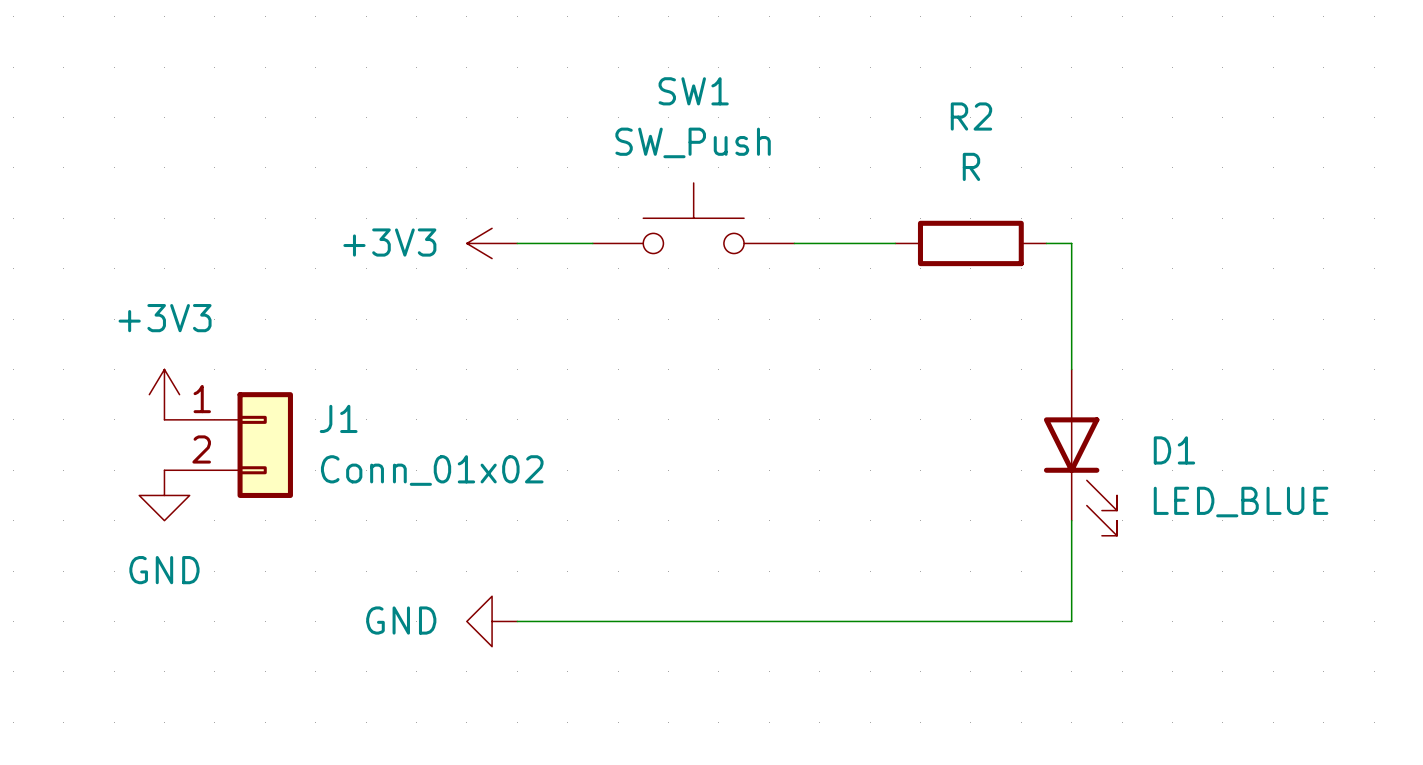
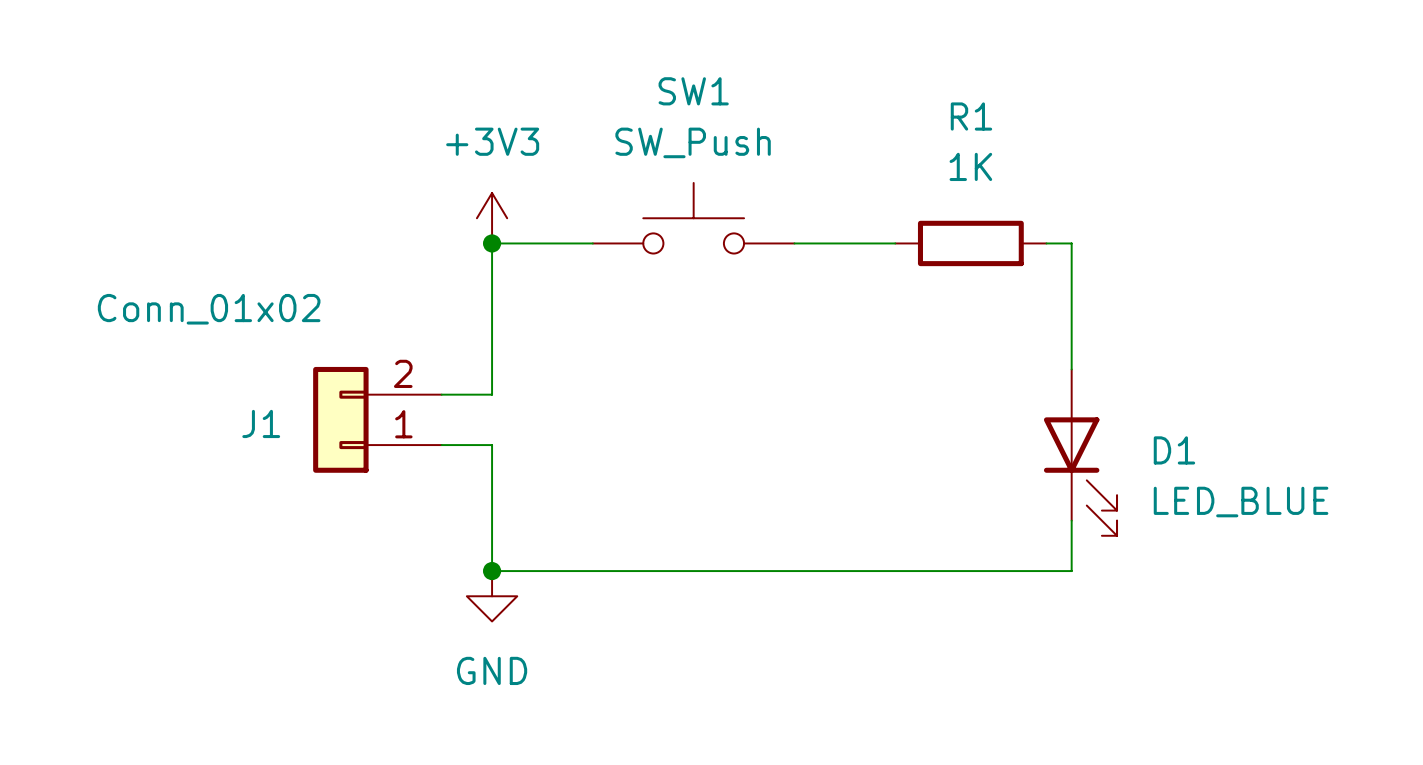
R2 name: R2 (971, 116) -> R1 (971, 116)
R2 value: R (971, 166) -> 1K (970, 166)
power symbol rotation: 0° (492, 243) -> 90° clockwise (492, 218)
junction: none -> (492, 243)
wire: none -> (517, 243) (492, 243) (492, 394) (441, 394)
power symbol: +3V3 (164, 394) -> none
J1 position: (228, 445) -> (377, 419)
J1 rotation: 0° (265, 445) -> 180° (340, 419)
J1 value position: Conn_01x02 (432, 470) -> Conn_01x02 (209, 309)
power symbol: GND (164, 495) -> none
junction: none -> (492, 571)
wire: (1071, 571) (1071, 621) (517, 621) -> (1071, 571) (492, 571) (492, 445) (441, 445)
power symbol rotation: 0° (492, 621) -> 90° counterclockwise (492, 596)

